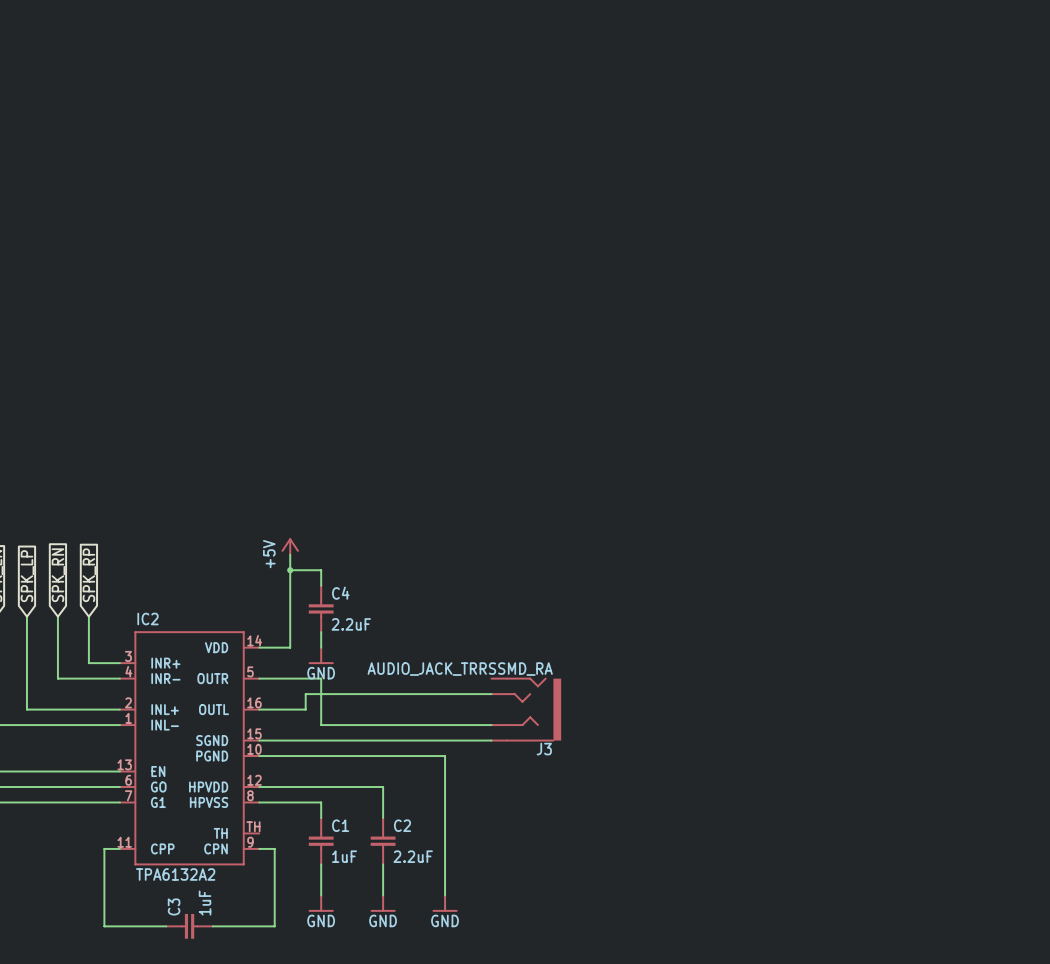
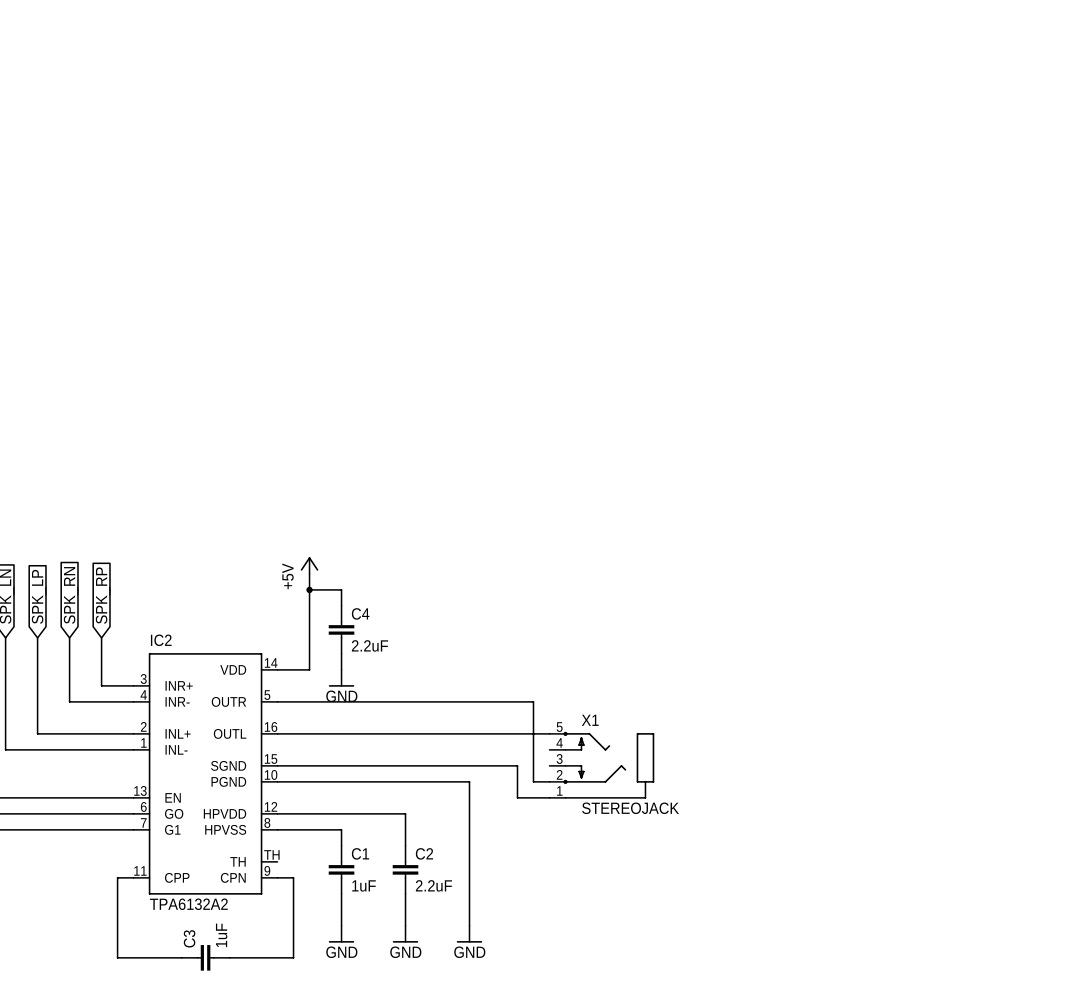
wire: (321, 678) (321, 725) (491, 725) -> (341, 701) (533, 701) (533, 781) (549, 781)
wire: (491, 694) (305, 694) (305, 709) -> (549, 733) (325, 733)
J3: AUDIO_JACK_TRRSSMD_RA (526, 709) -> none
X1: none -> STEREOJACK (601, 765)
wire: none -> (517, 765) (517, 797) (549, 797)

